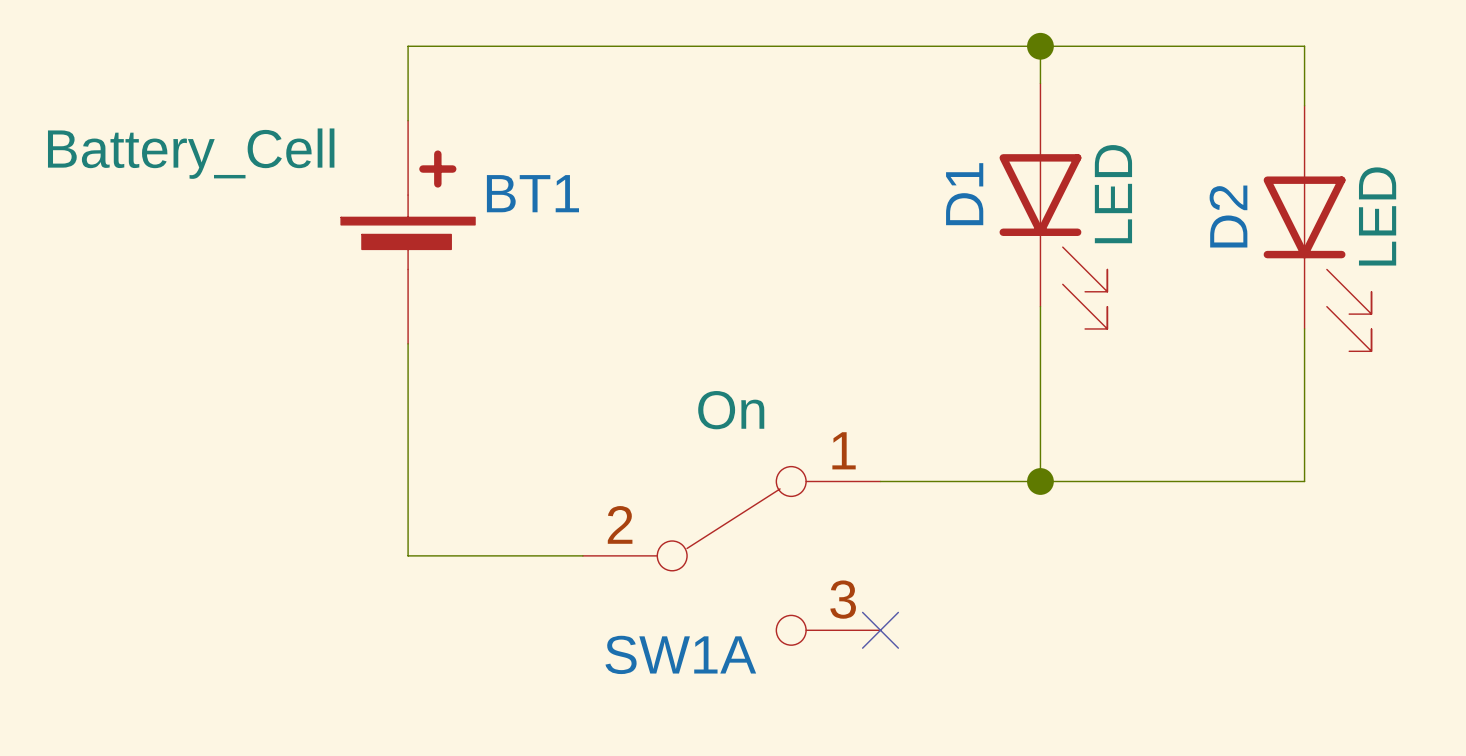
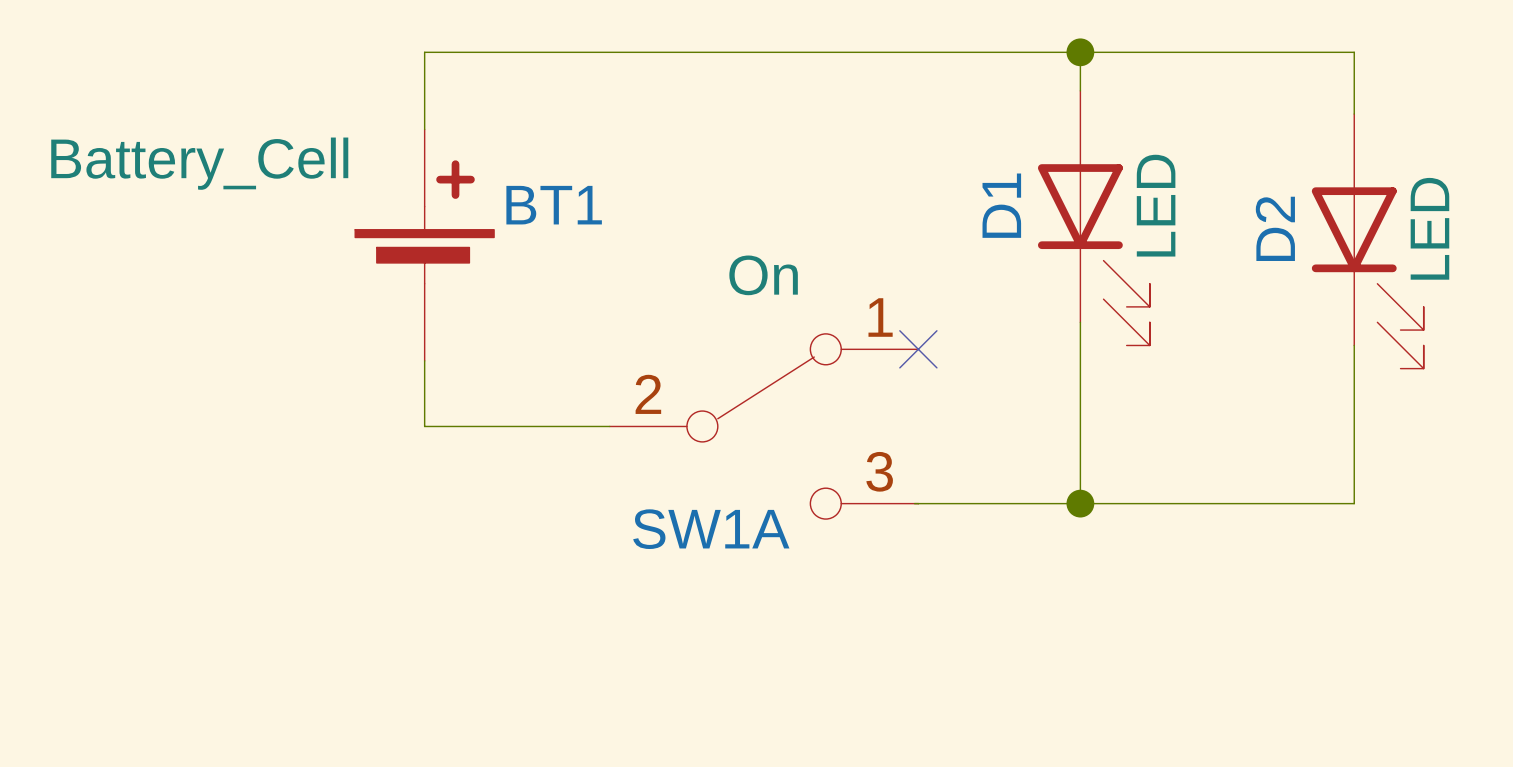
no-connect mark: none -> (918, 349)
wire: (408, 407) (408, 555) (582, 555) -> (424, 426) (609, 426)
SW1A position: (731, 555) -> (764, 426)
no-connect mark: (880, 630) -> none

